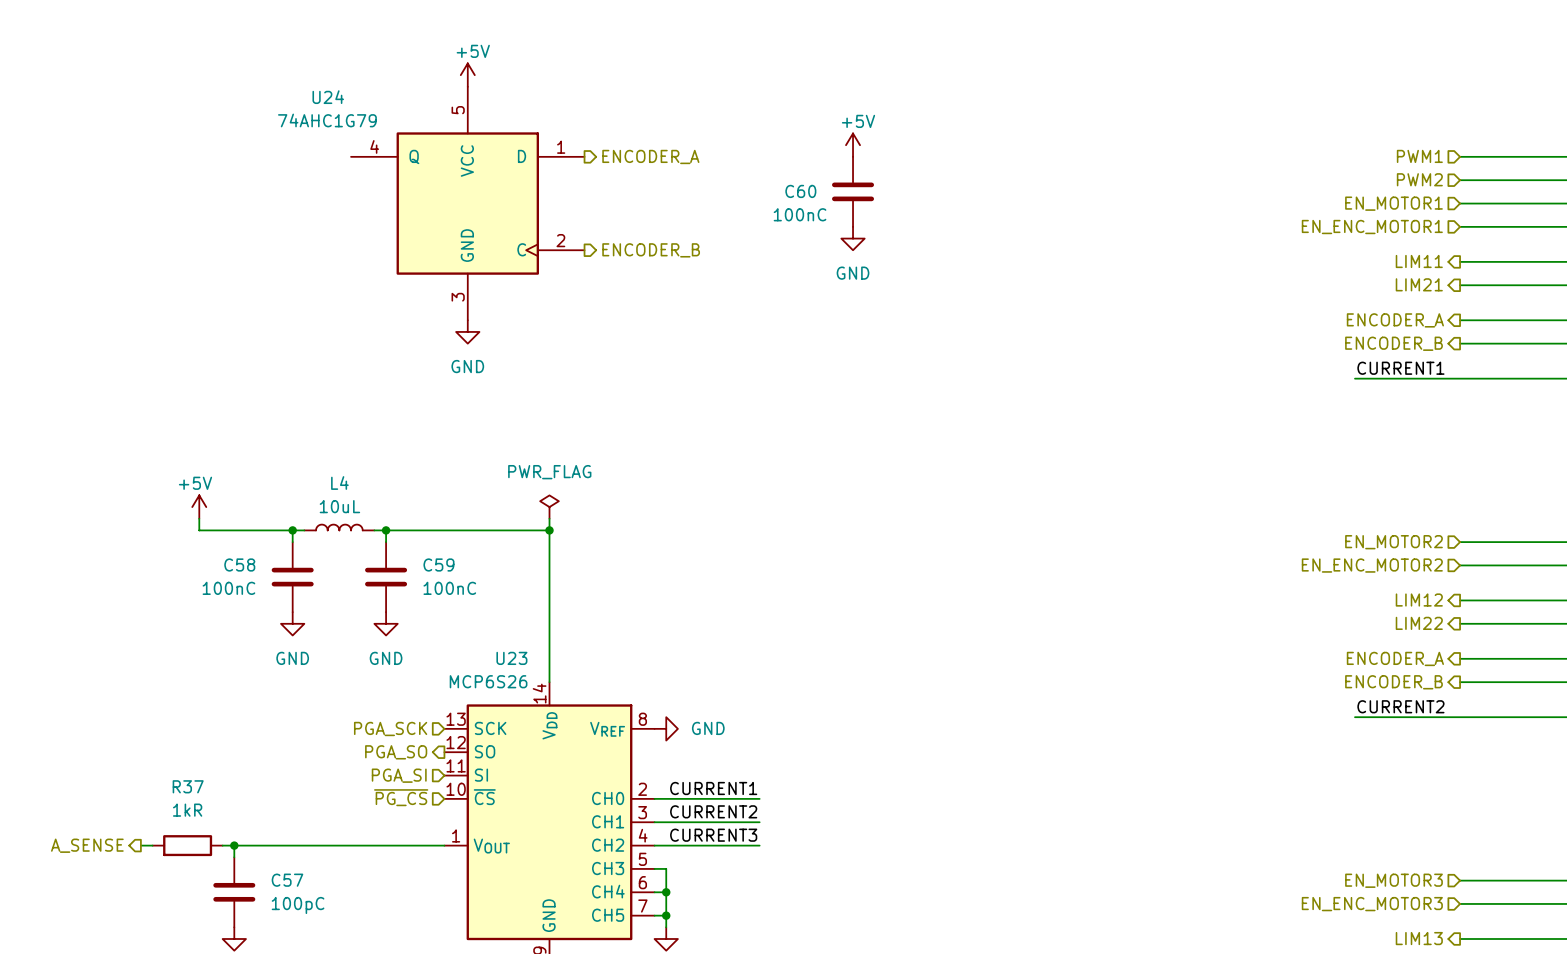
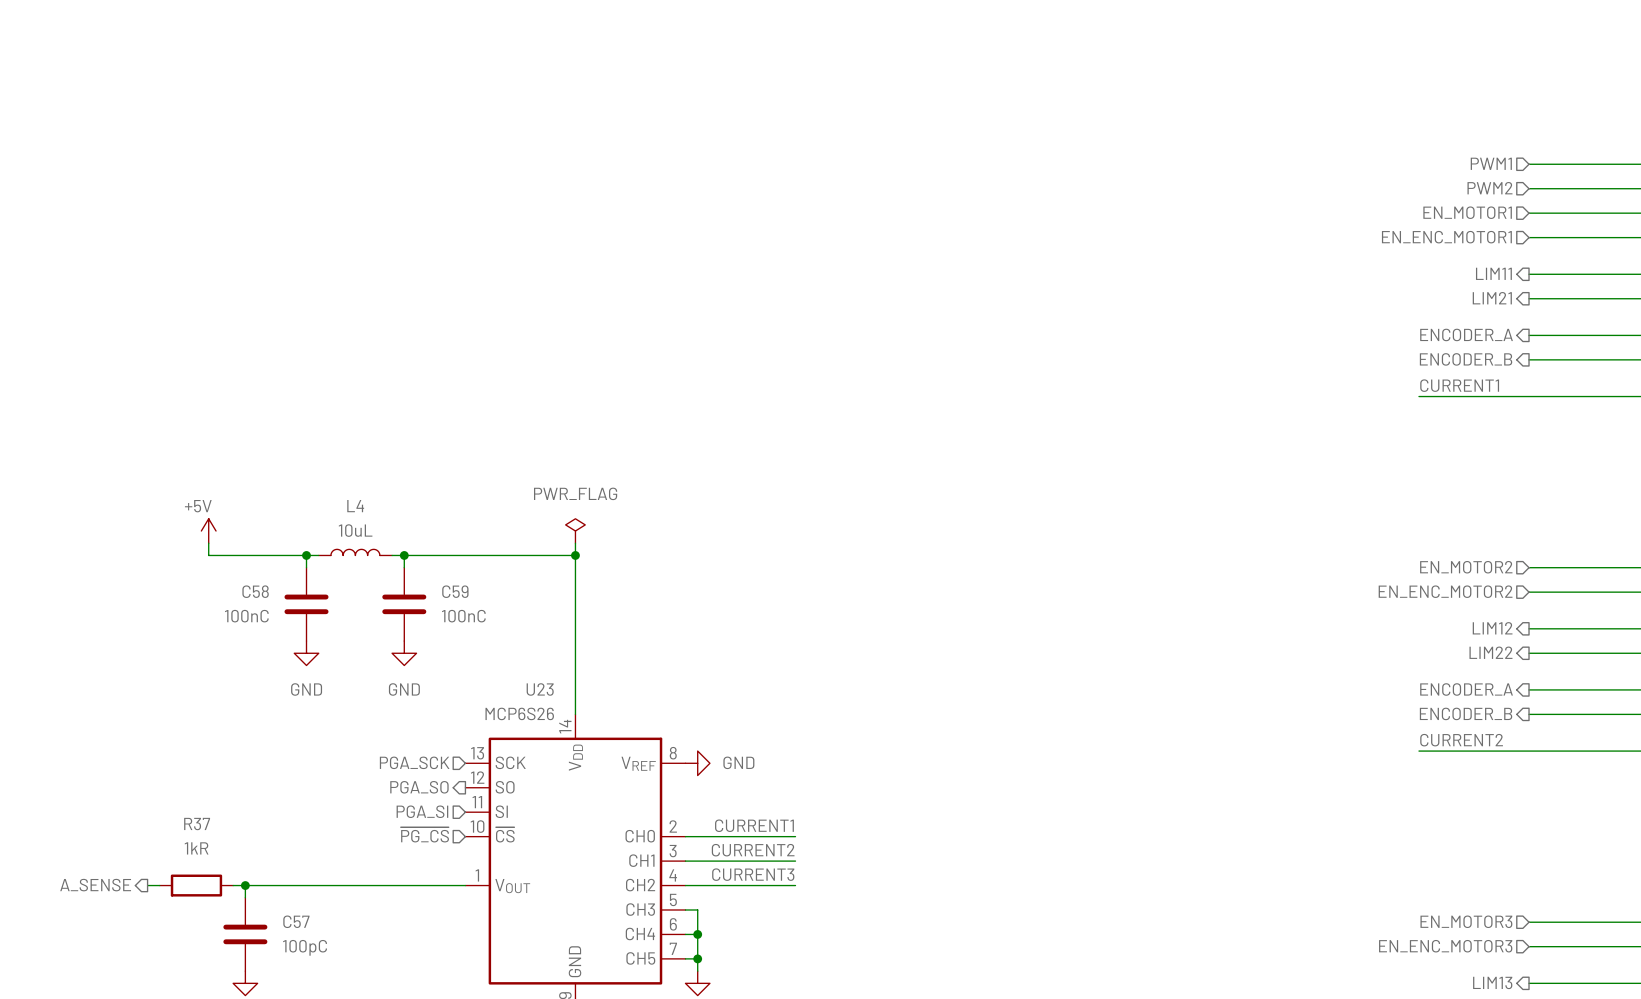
power symbol: +5V (467, 75) -> none
power symbol: +5V (853, 145) -> none
hierarchical label: ENCODER_A (650, 156) -> none
C60: 100nC (853, 191) -> none
U24: 74AHC1G79 (467, 203) -> none
power symbol: GND (853, 238) -> none
hierarchical label: ENCODER_B (651, 250) -> none
power symbol: GND (467, 331) -> none

